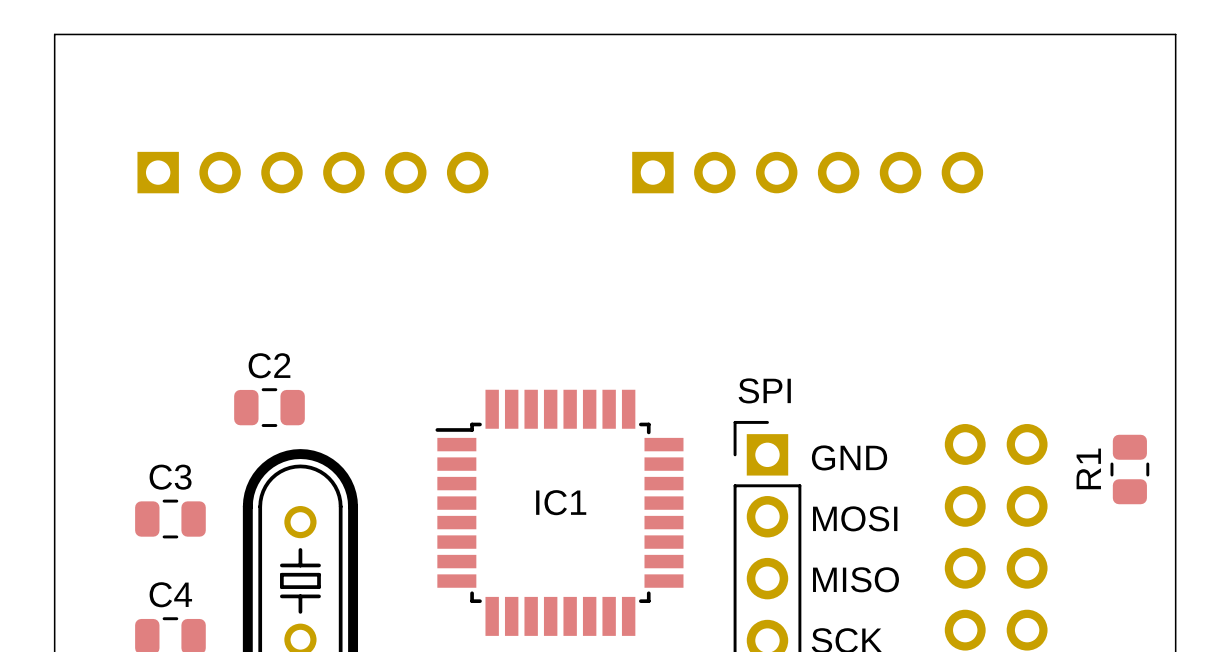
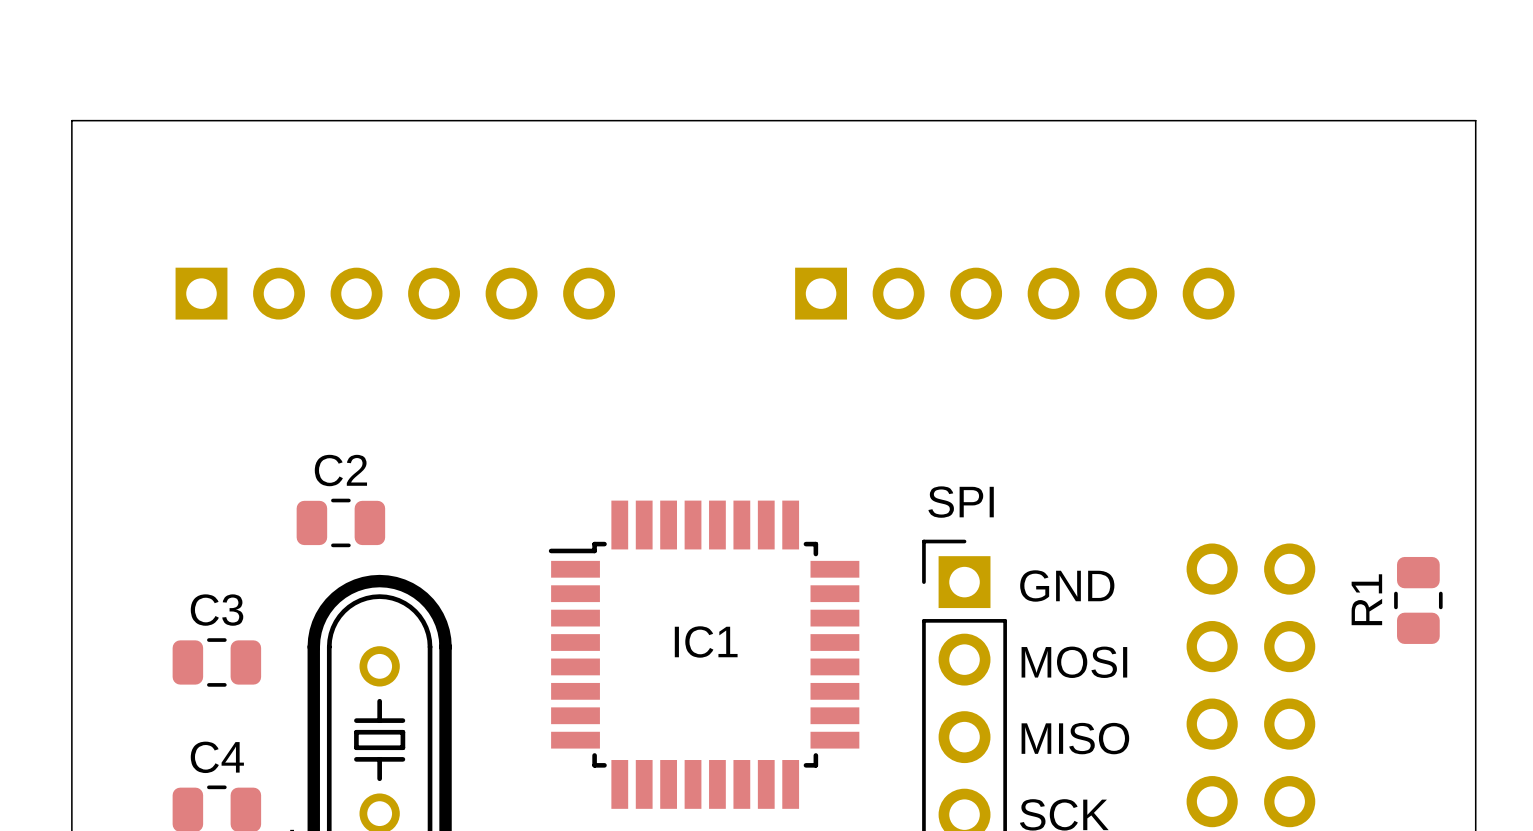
board edge: (54, 86) (54, 34) (1175, 34) (1175, 86) -> (71, 120) (1475, 120)
part position: (312, 172) -> (395, 293)
part position: (807, 172) -> (1014, 293)

